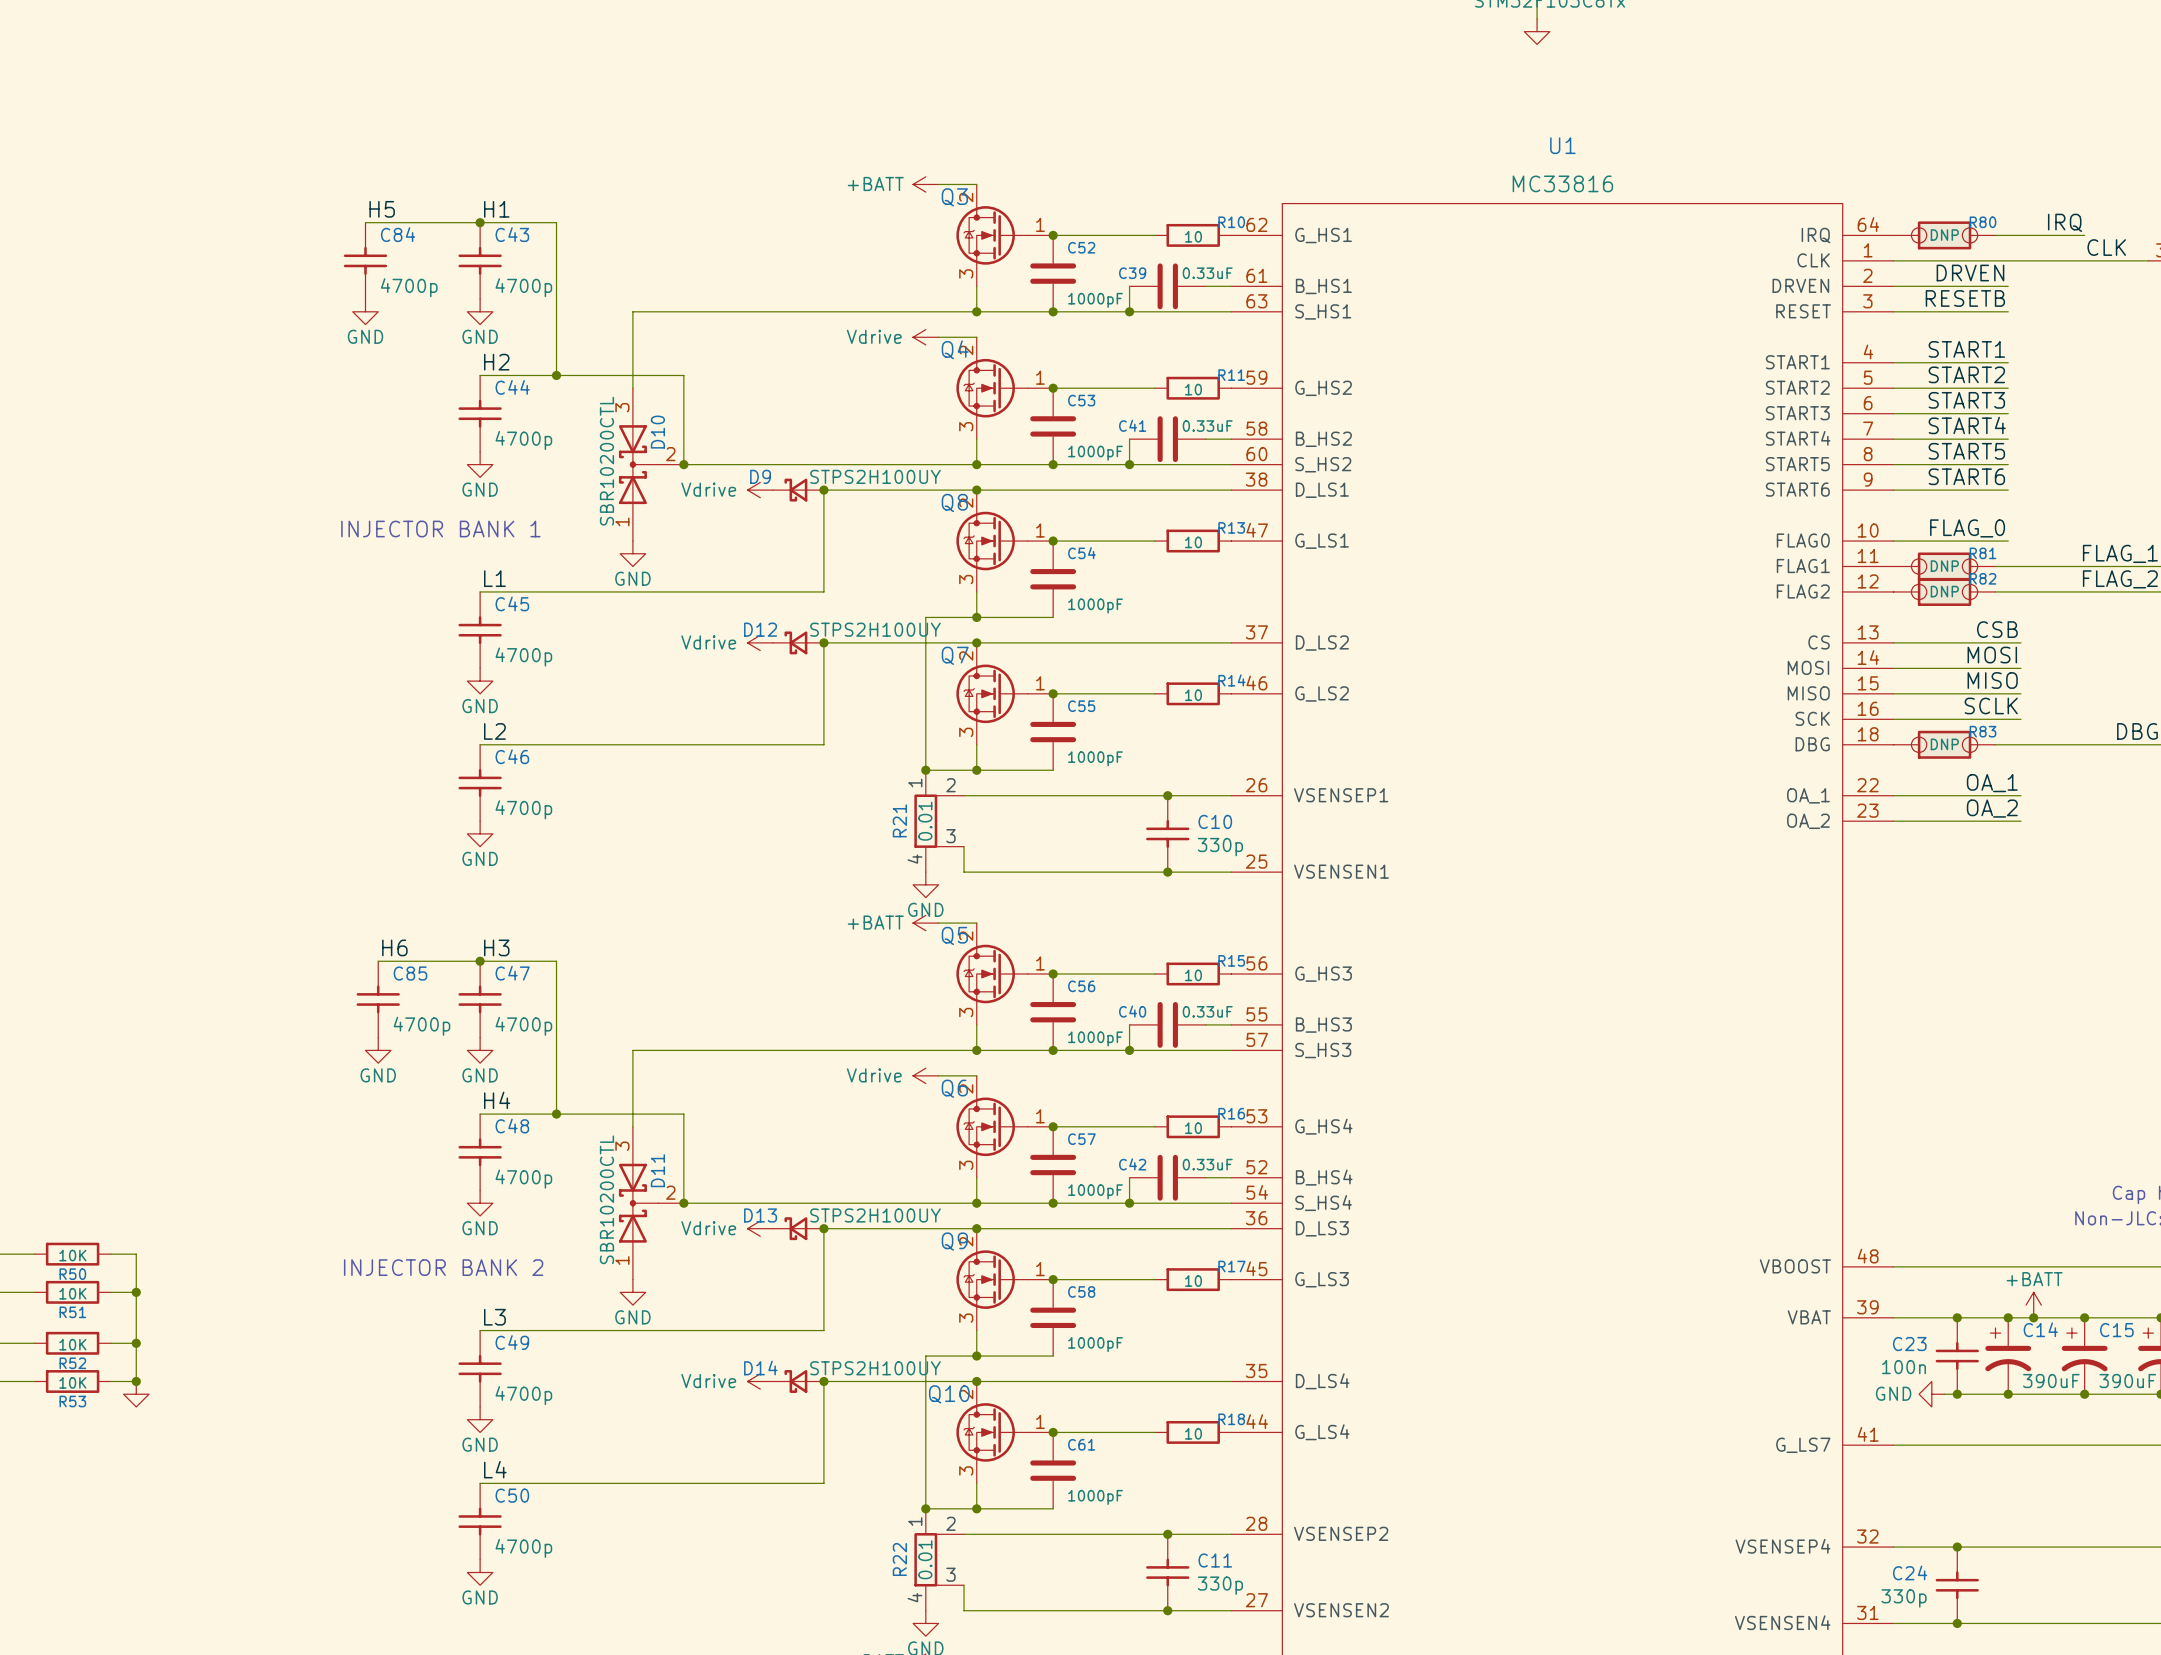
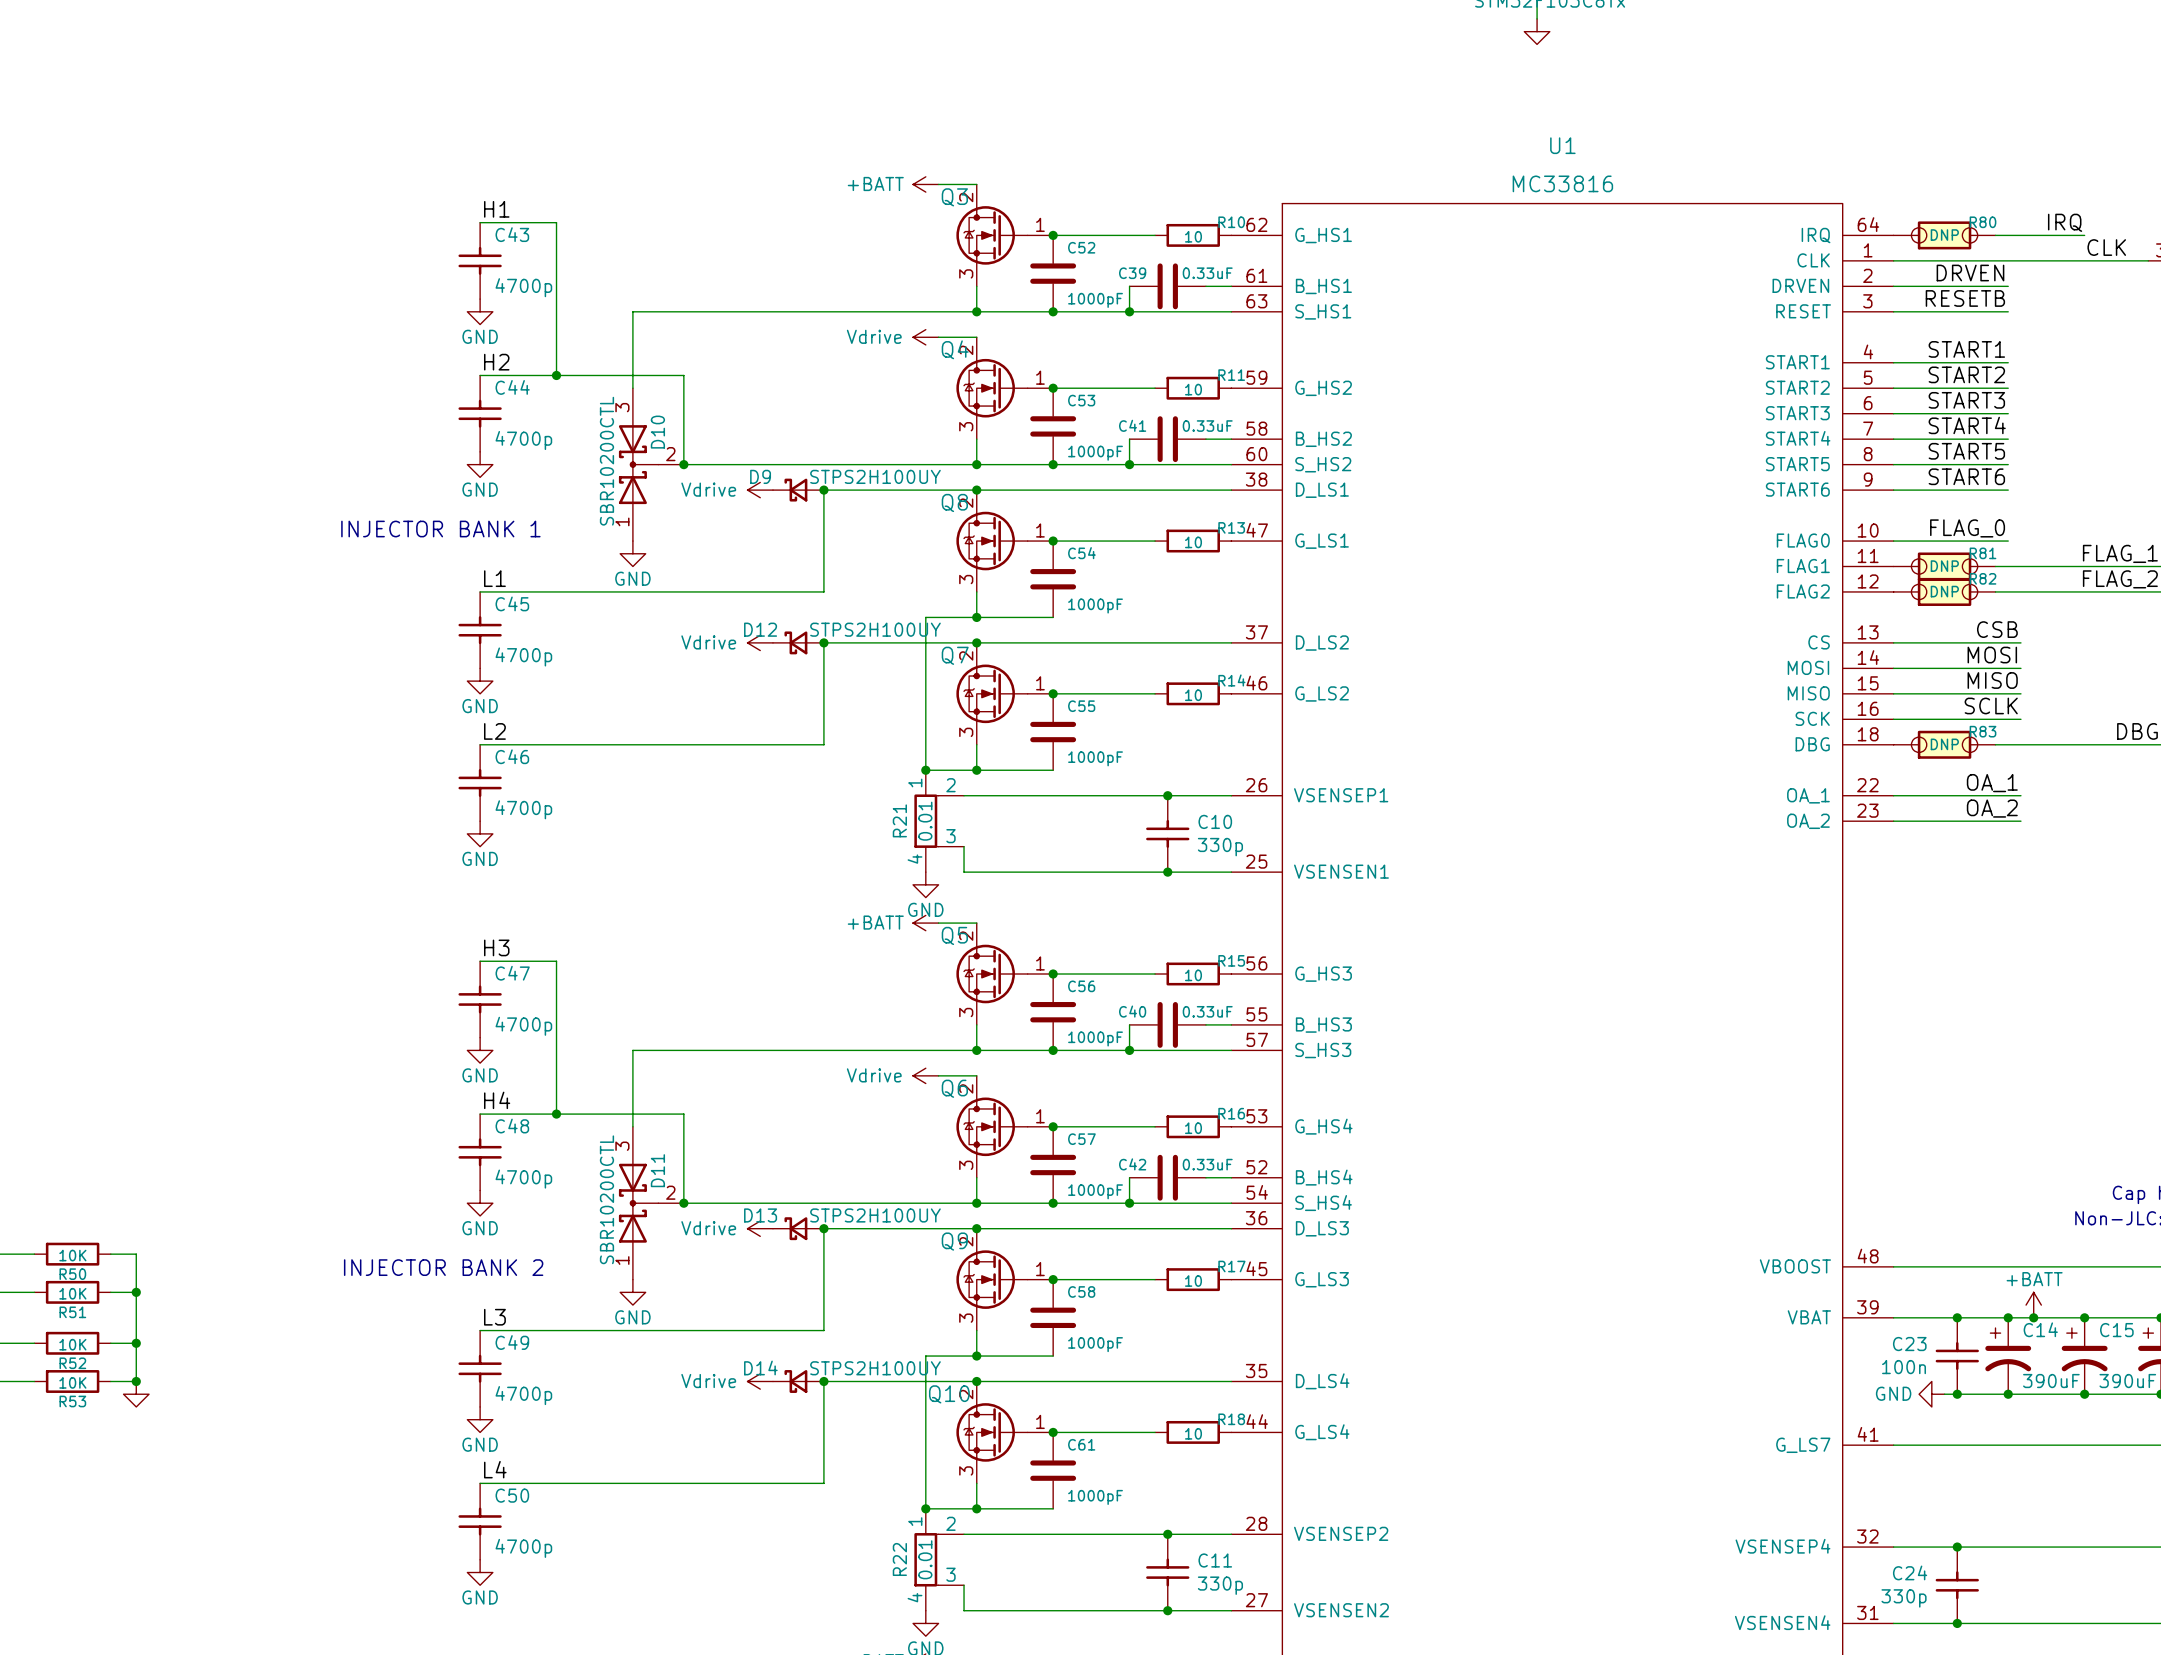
label: H5 (382, 209) -> none
wire: (365, 222) (480, 222) -> none
junction: (480, 222) -> none
C84: 4700p (365, 260) -> none
power symbol: GND (365, 311) -> none
label: H6 (394, 947) -> none
wire: (378, 961) (480, 961) -> none
junction: (480, 961) -> none
C85: 4700p (378, 999) -> none
power symbol: GND (378, 1050) -> none

